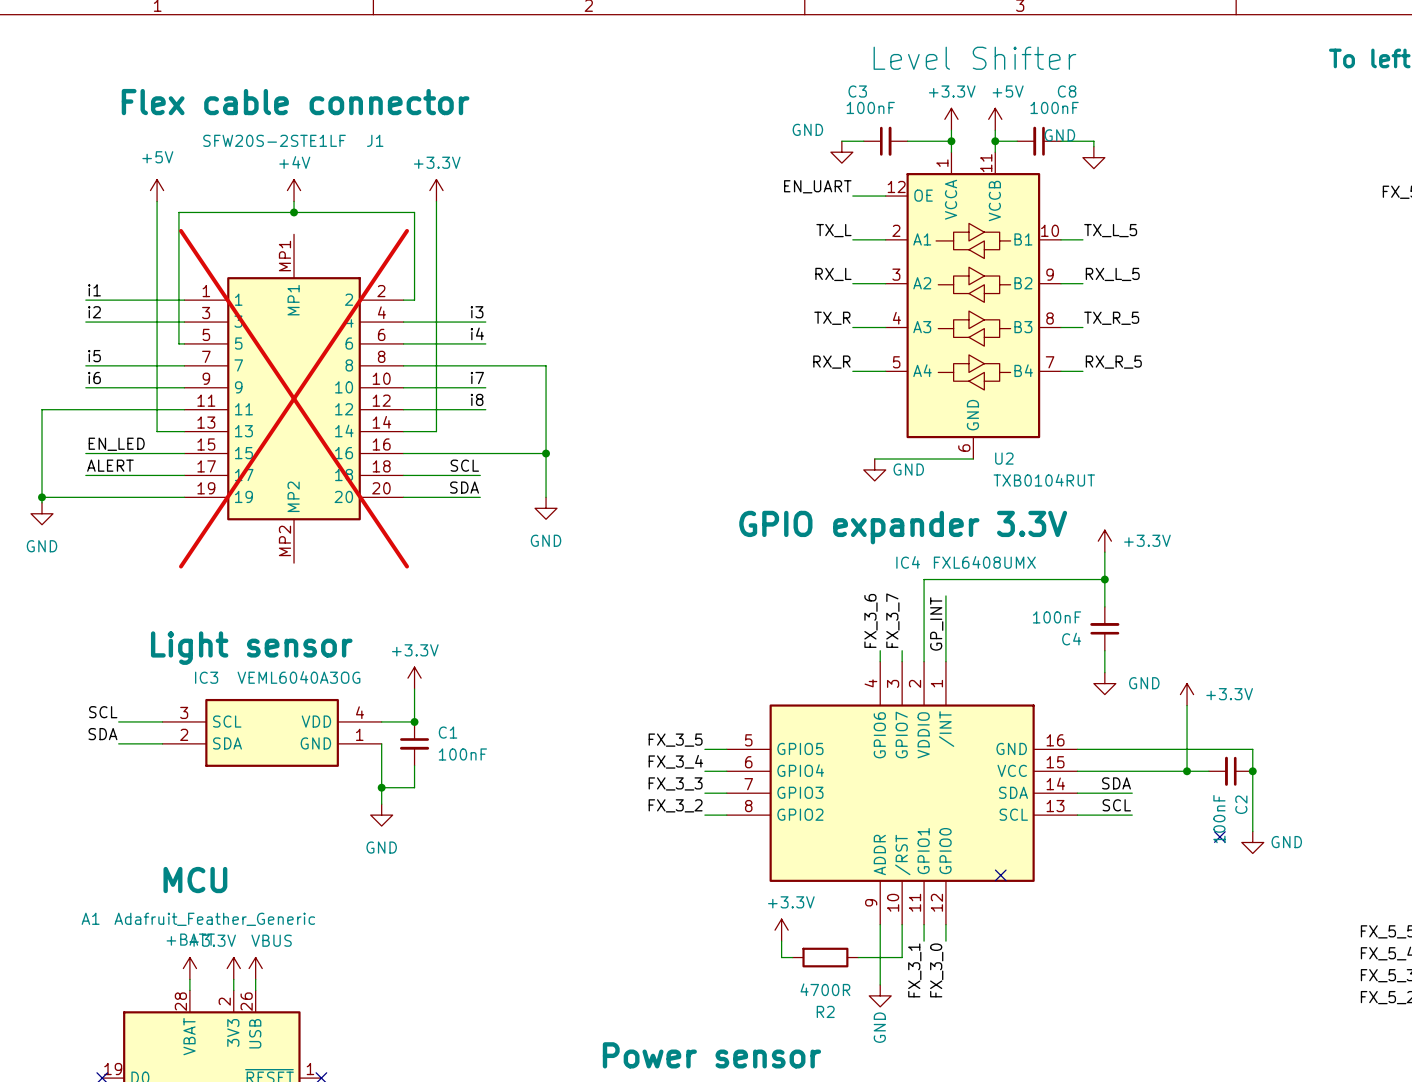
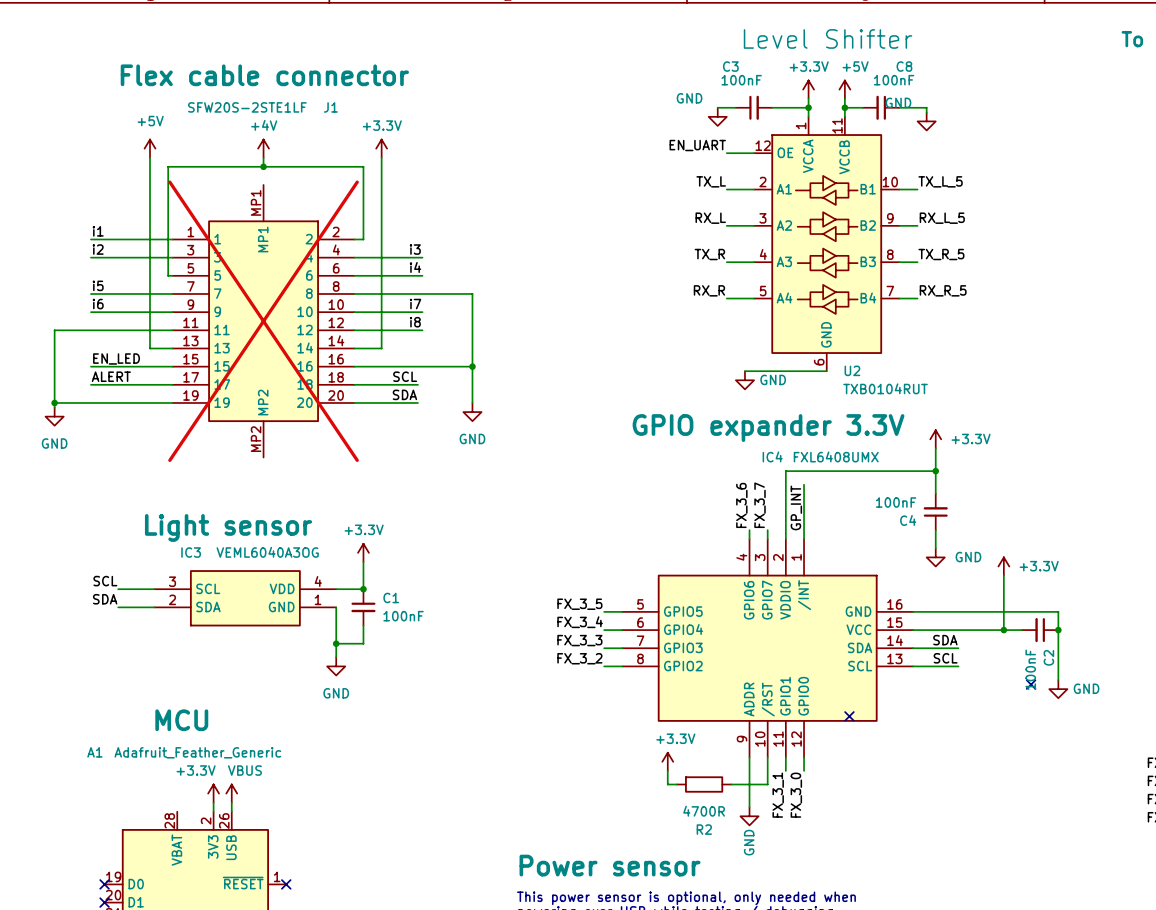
power symbol: +BATT (189, 968) -> none
wire: (189, 979) (189, 990) -> none

